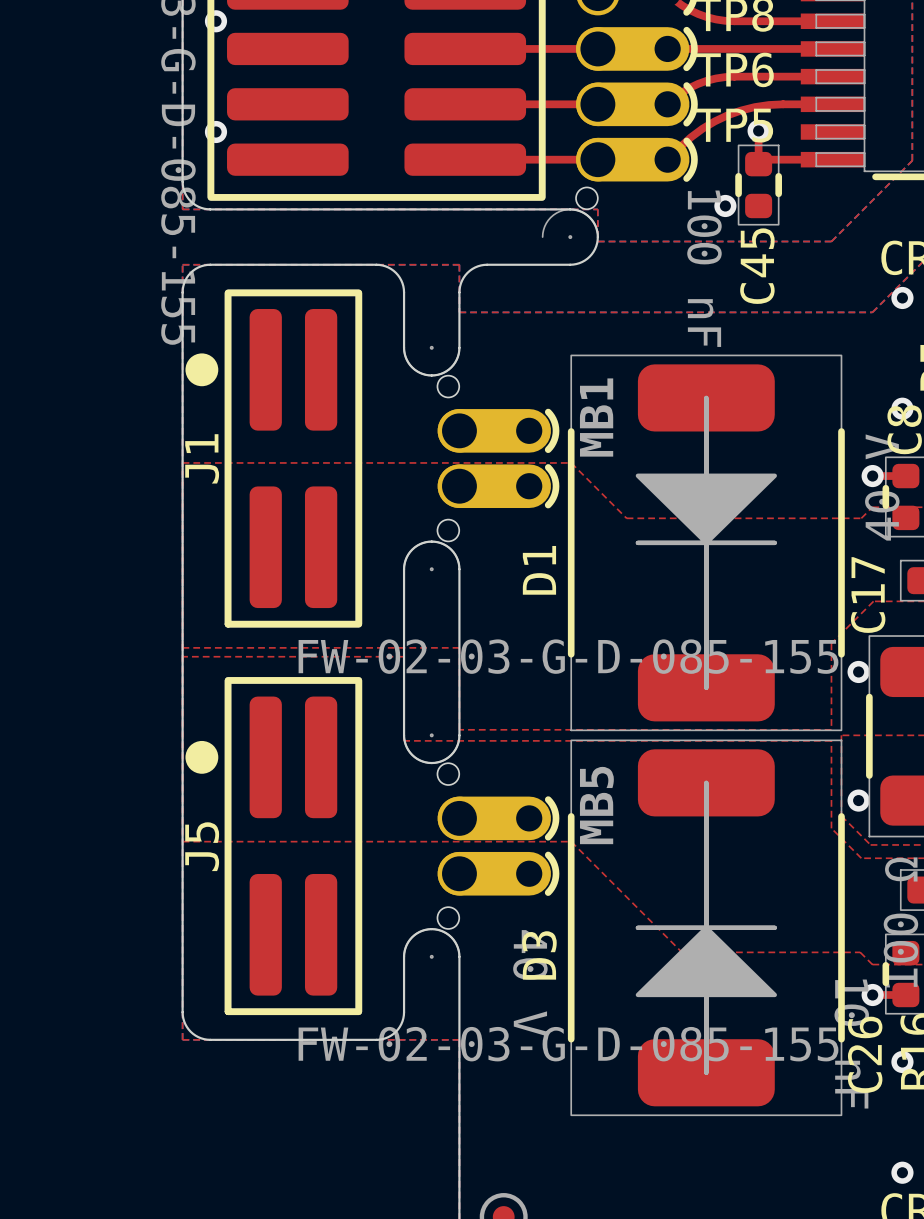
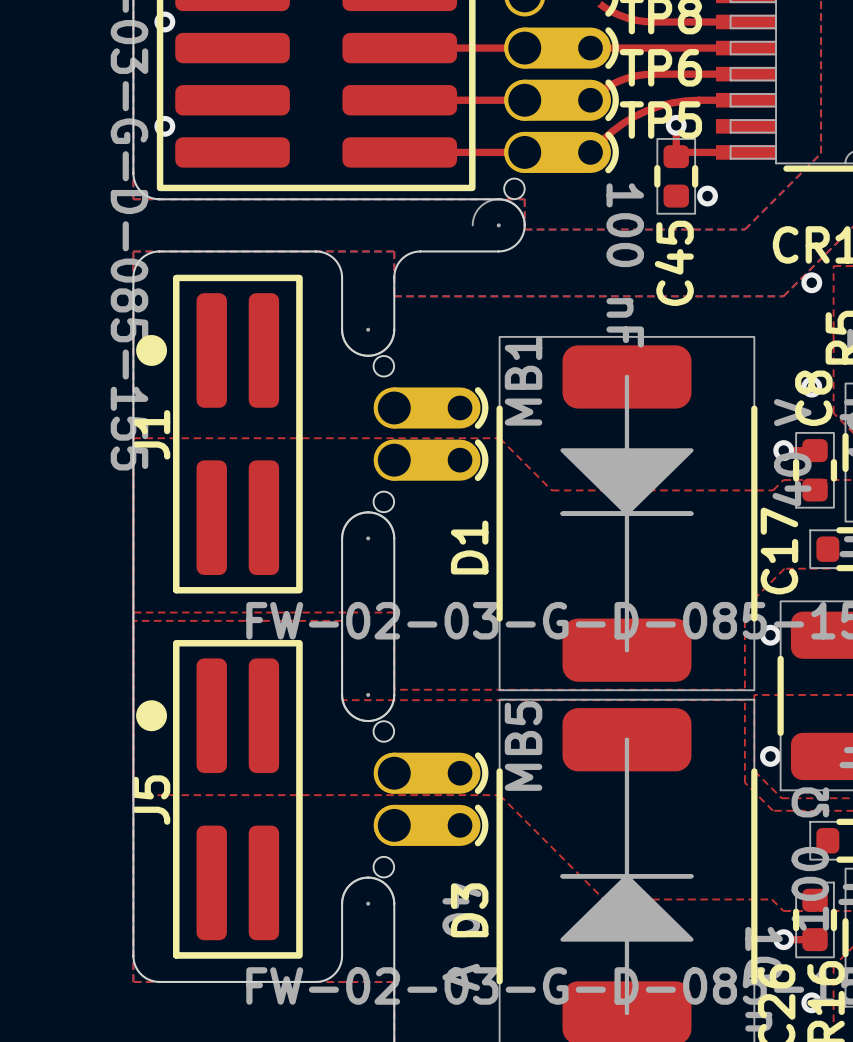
via position: (725, 205) -> (707, 196)

